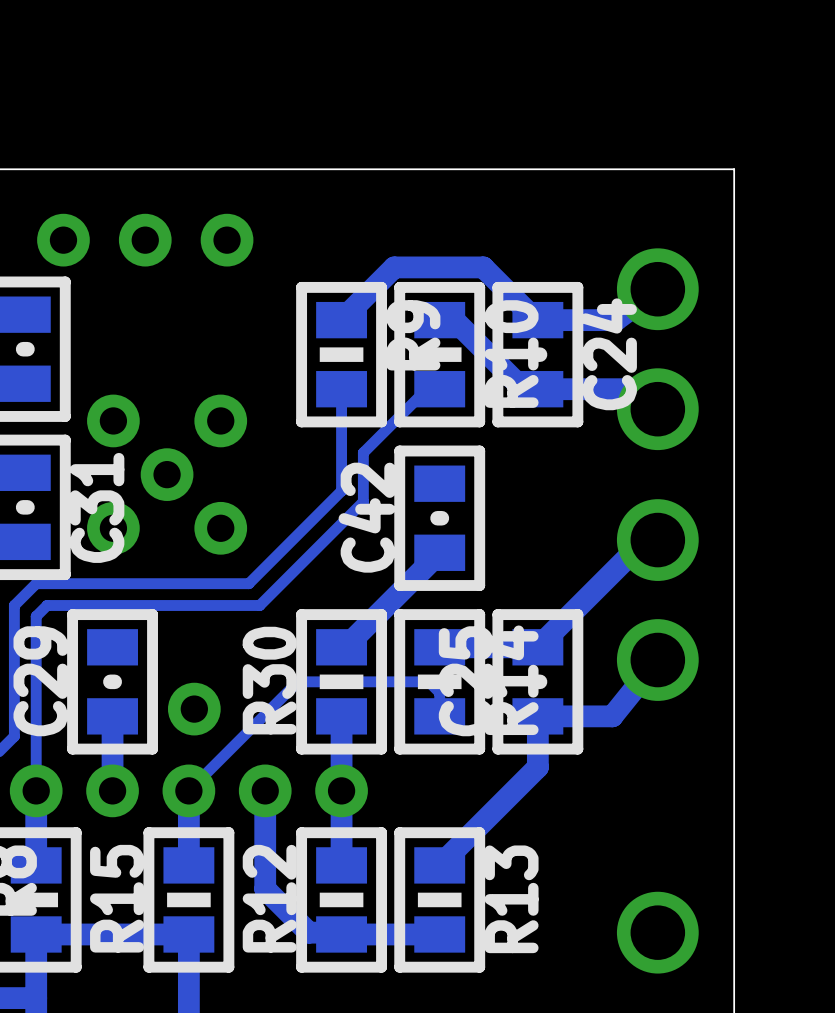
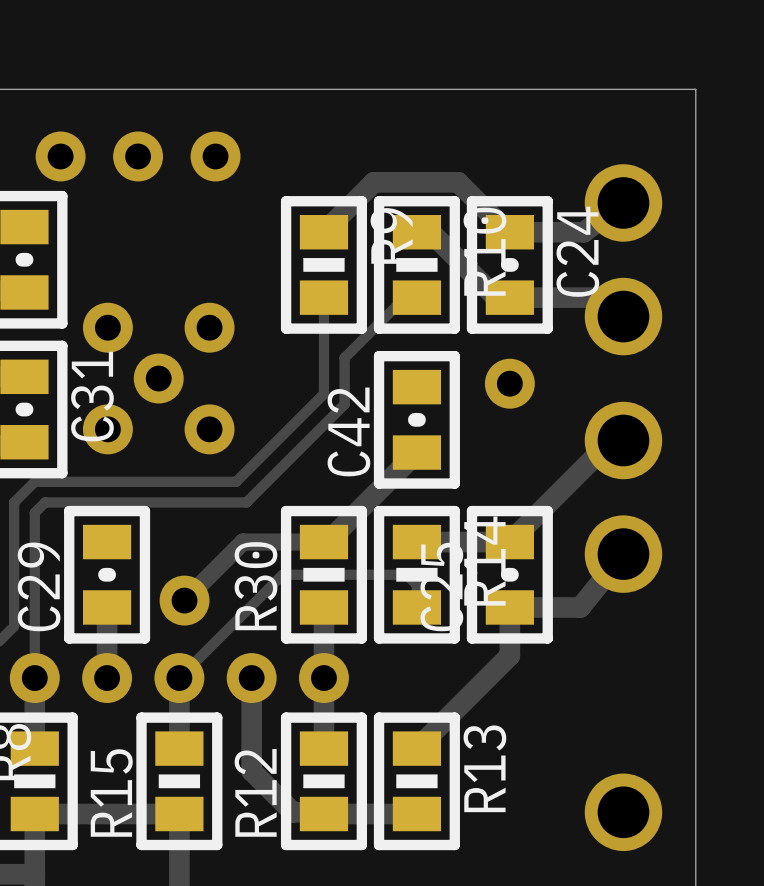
via: none -> (509, 383)
track: none -> (323, 542) (243, 542) (184, 600)

